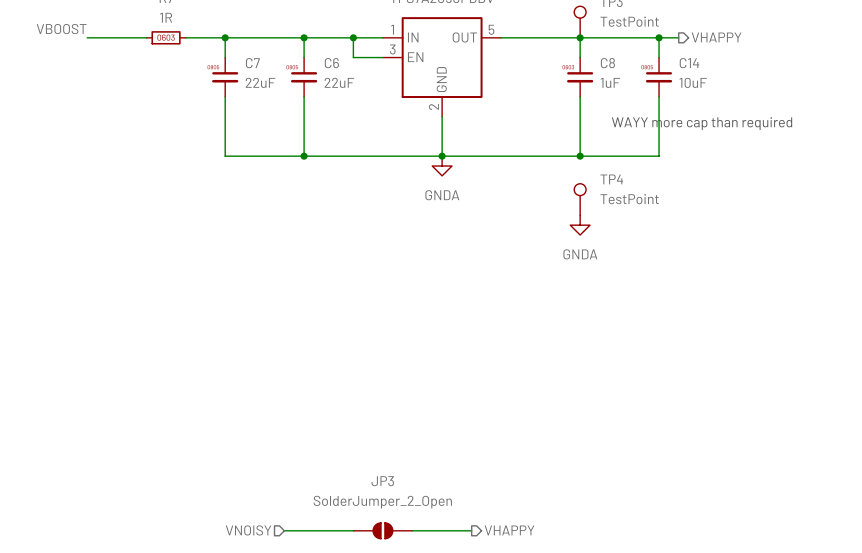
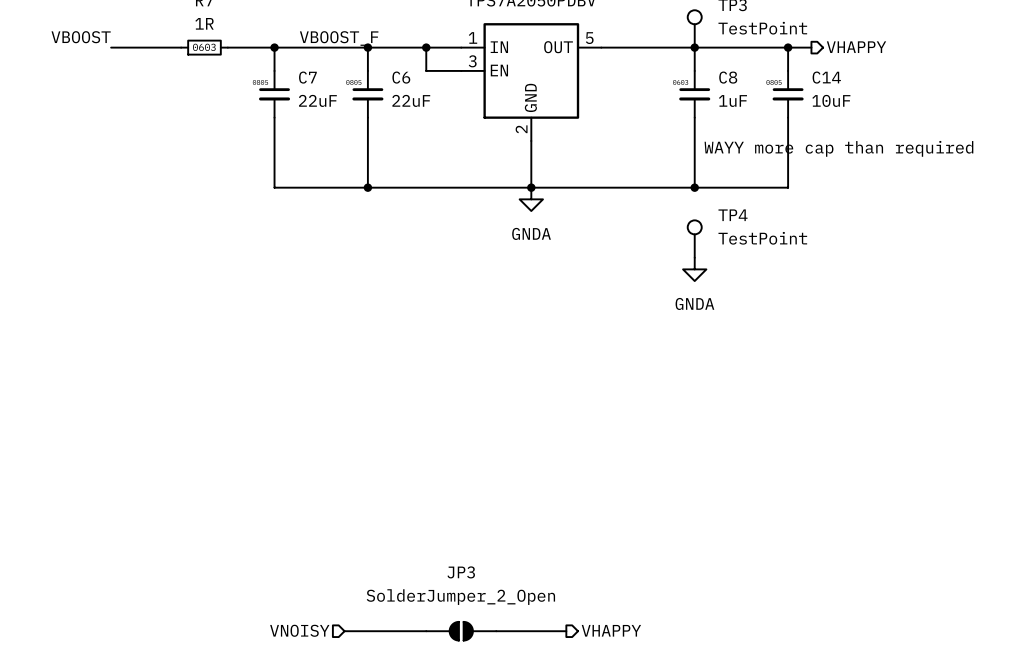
label: none -> VBOOST_F (339, 38)

